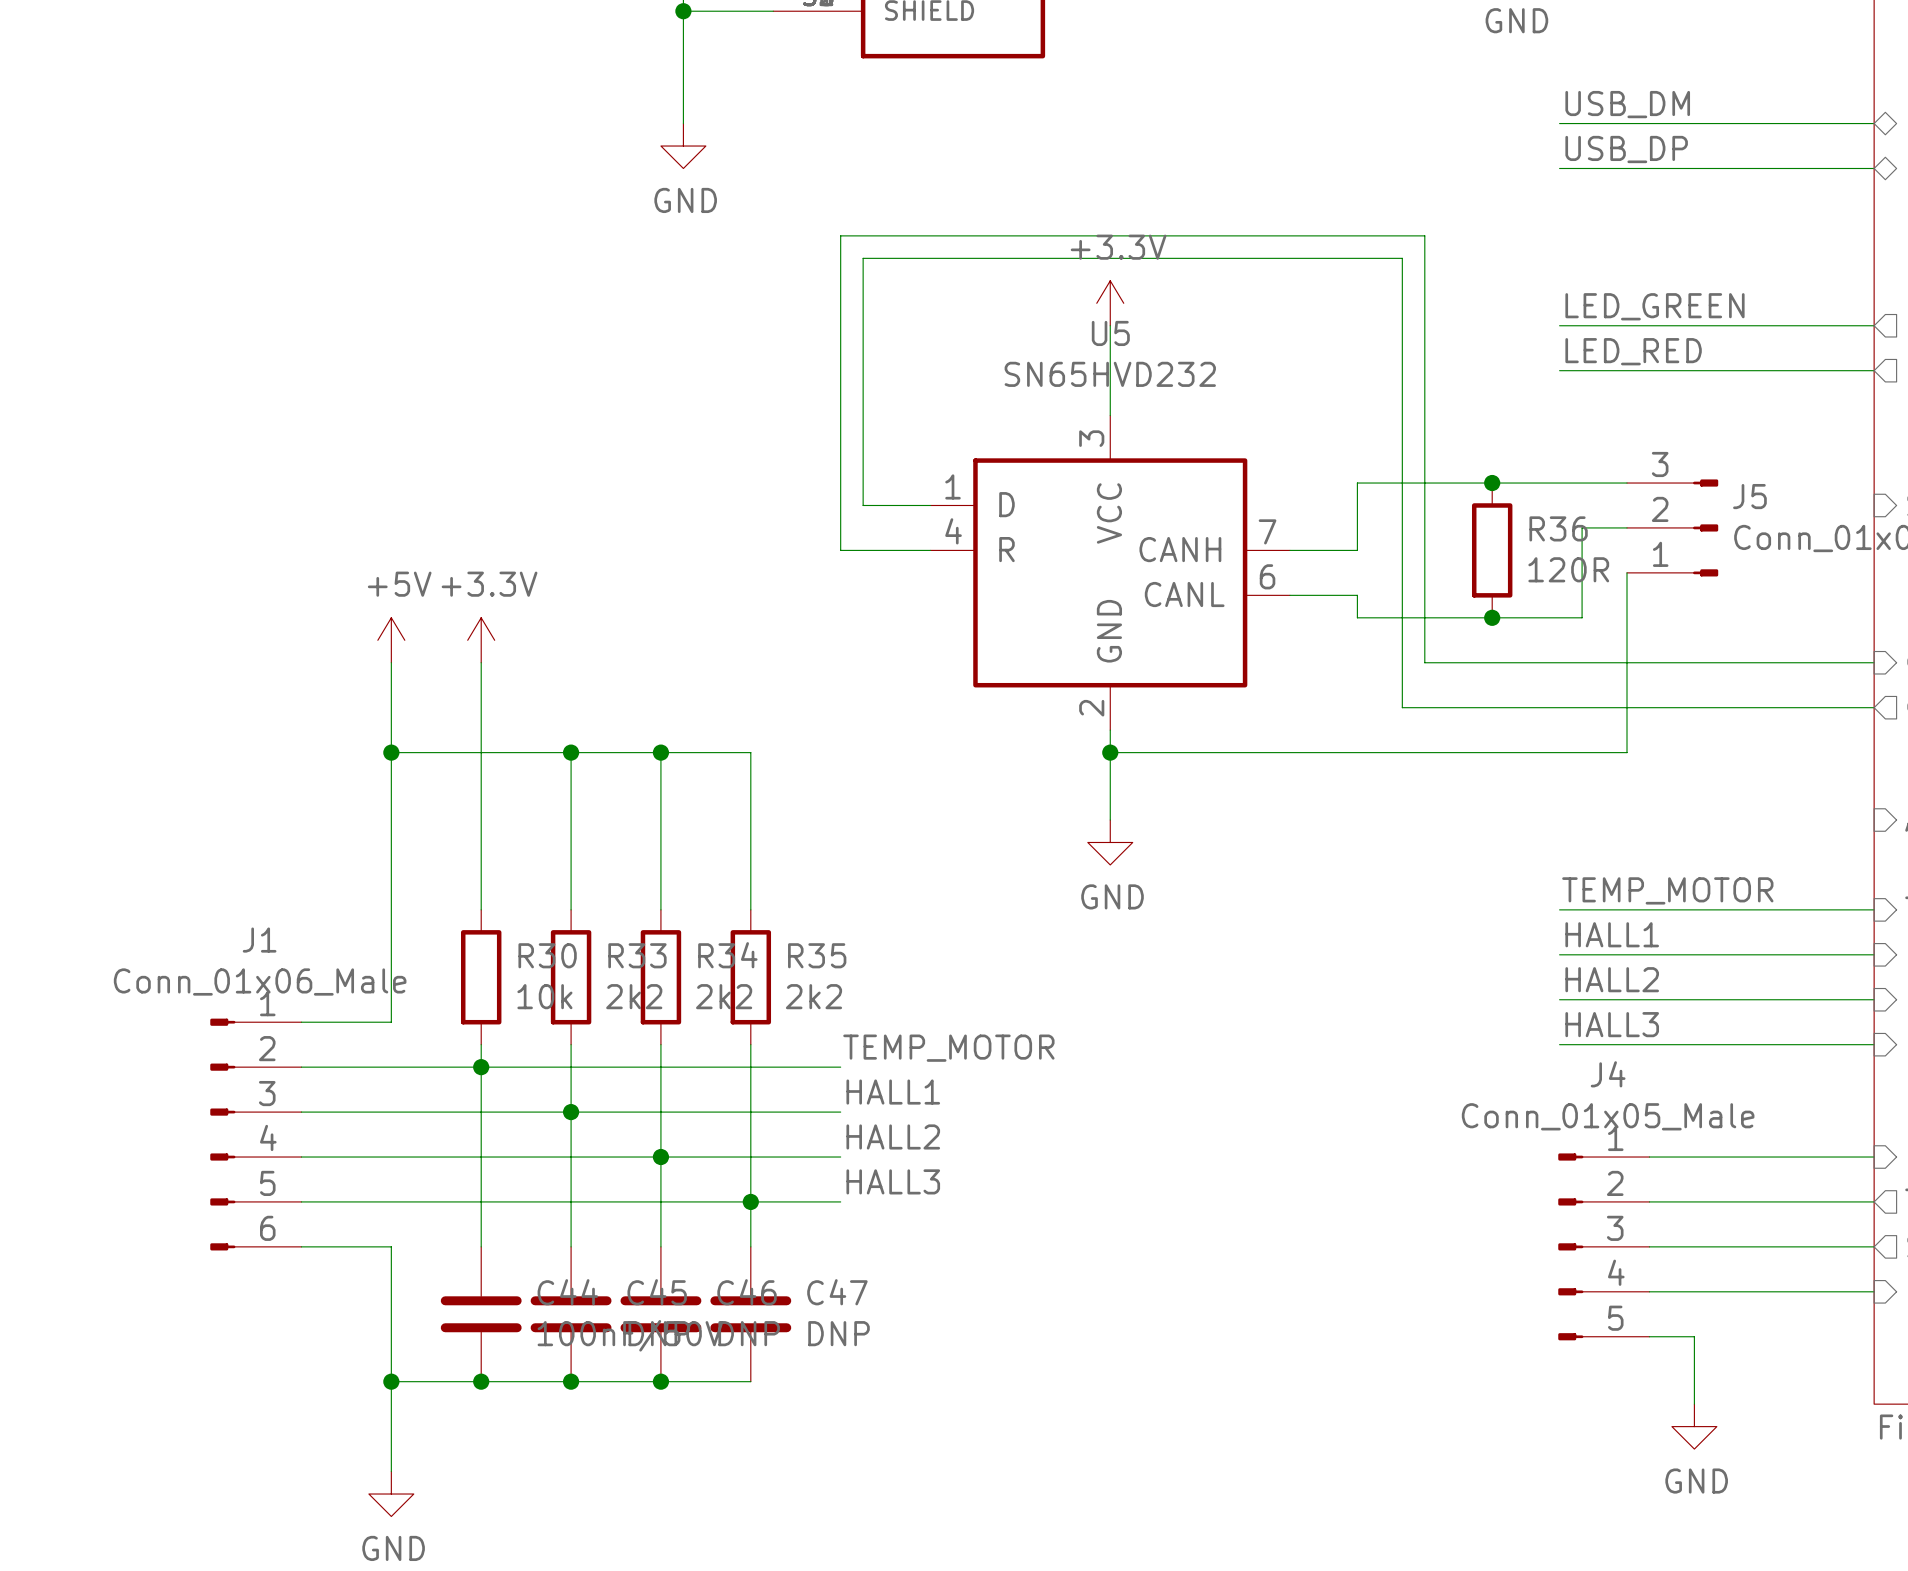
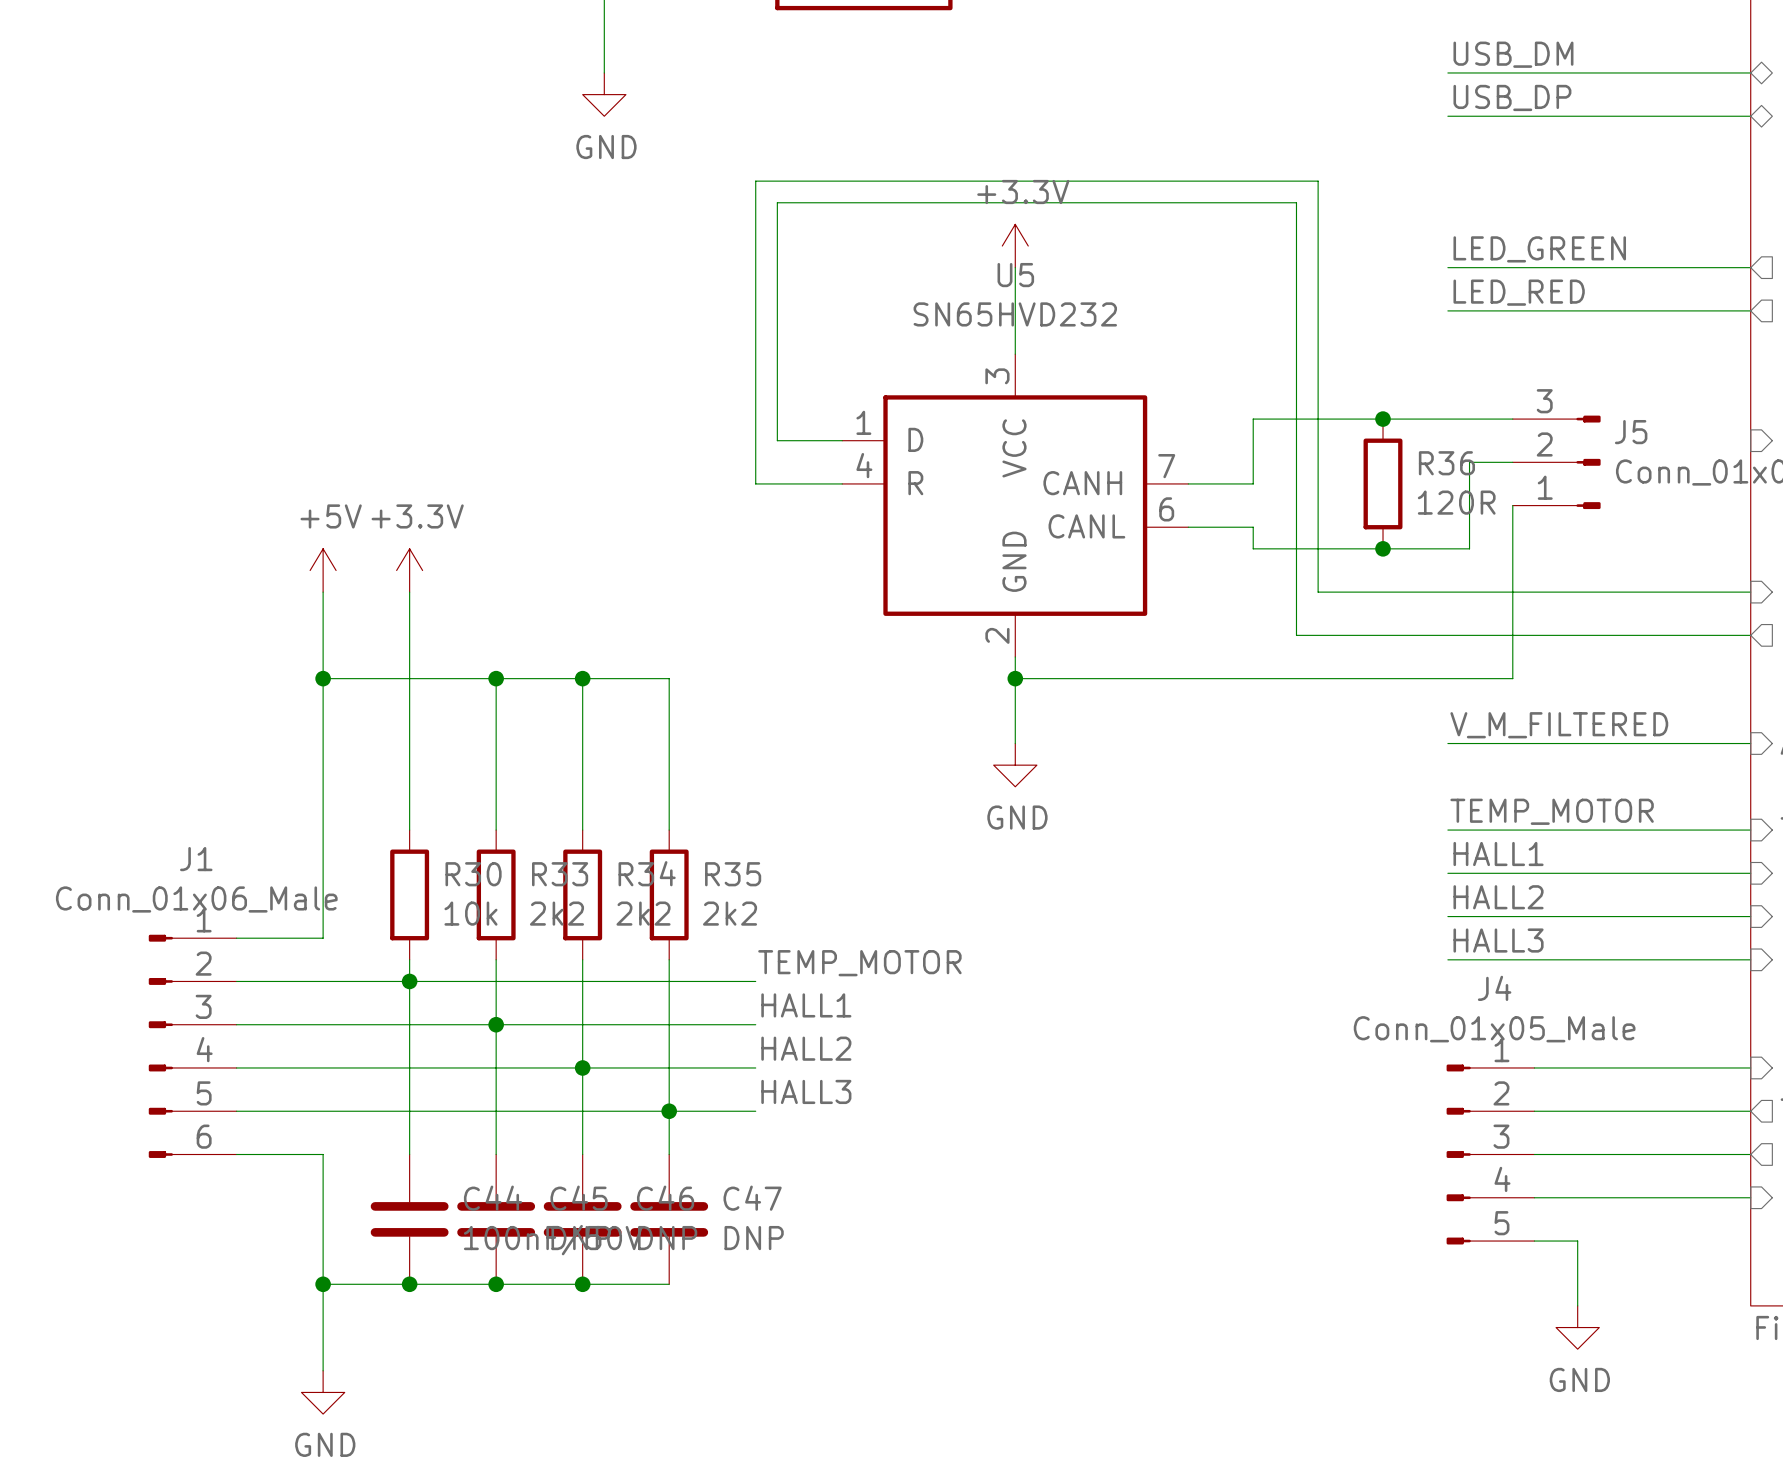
label: none -> V_M_FILTERED (1559, 725)
wire: none -> (1447, 743) (1750, 743)

